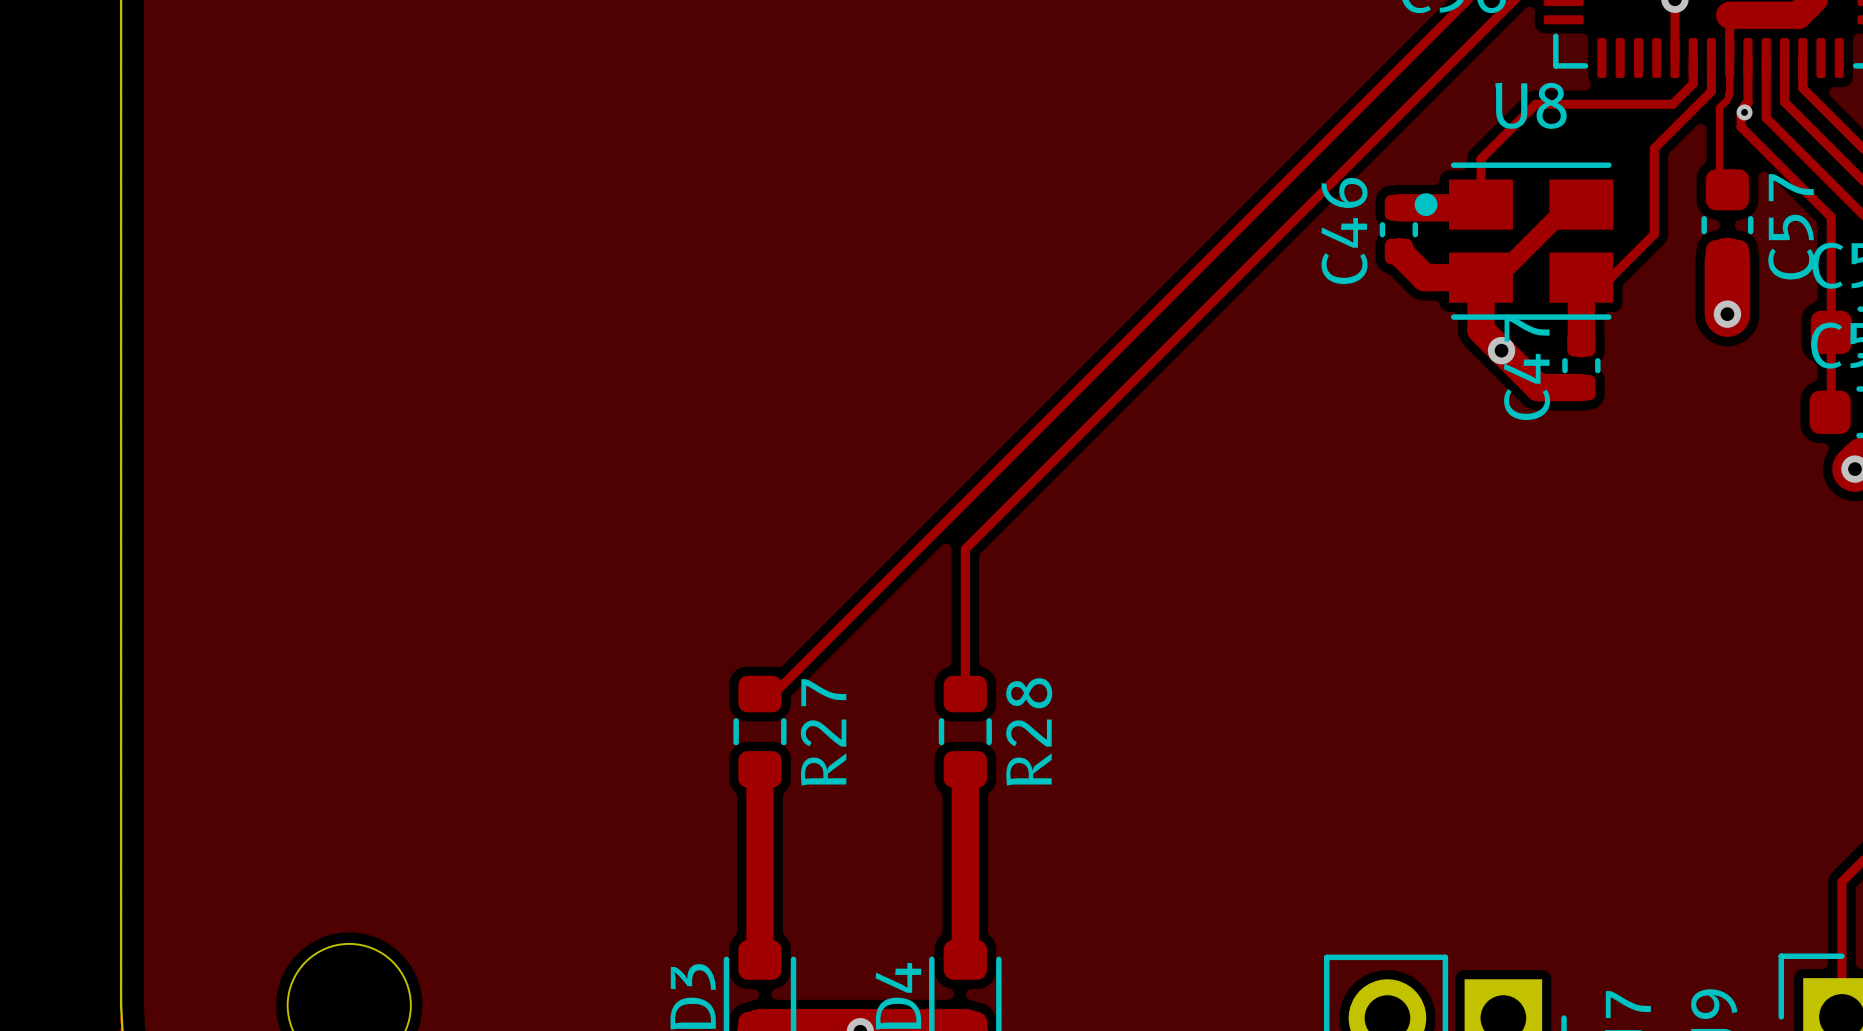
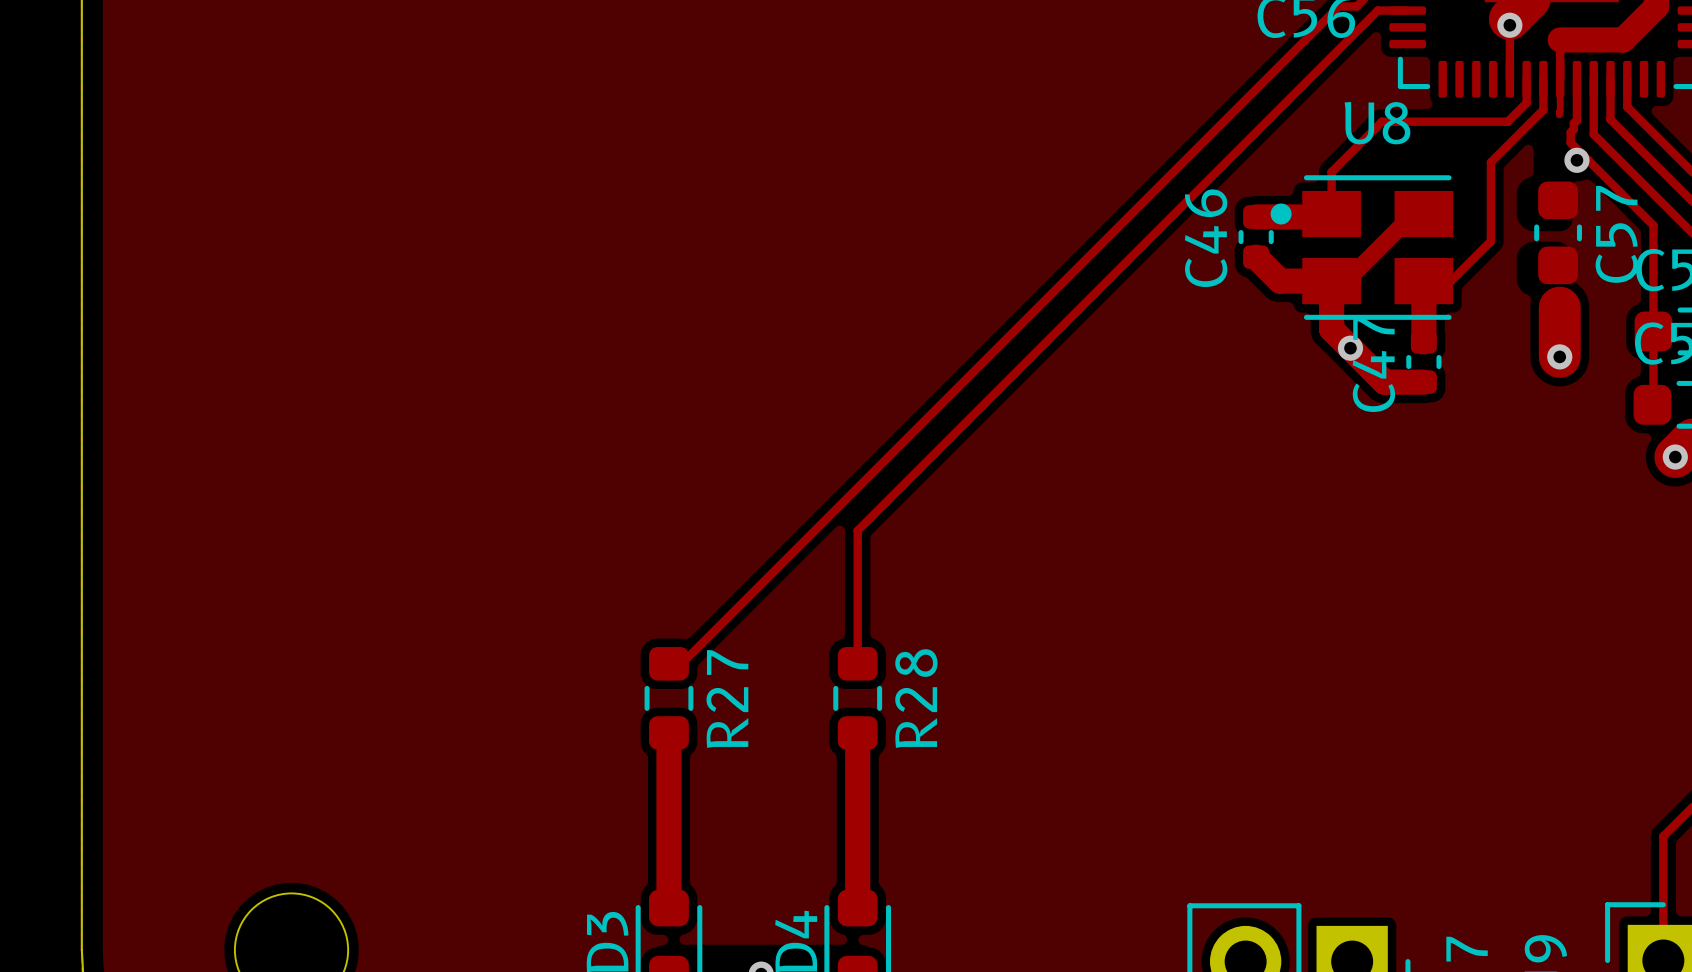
track: (1727, 100) (1719, 107) (1719, 181) (1727, 189) (1729, 187) -> none
via: (1744, 112) -> none
via: none -> (1576, 160)
track: (1727, 260) (1727, 314) -> (1559, 307) (1559, 356)
via position: (1727, 314) -> (1559, 356)

